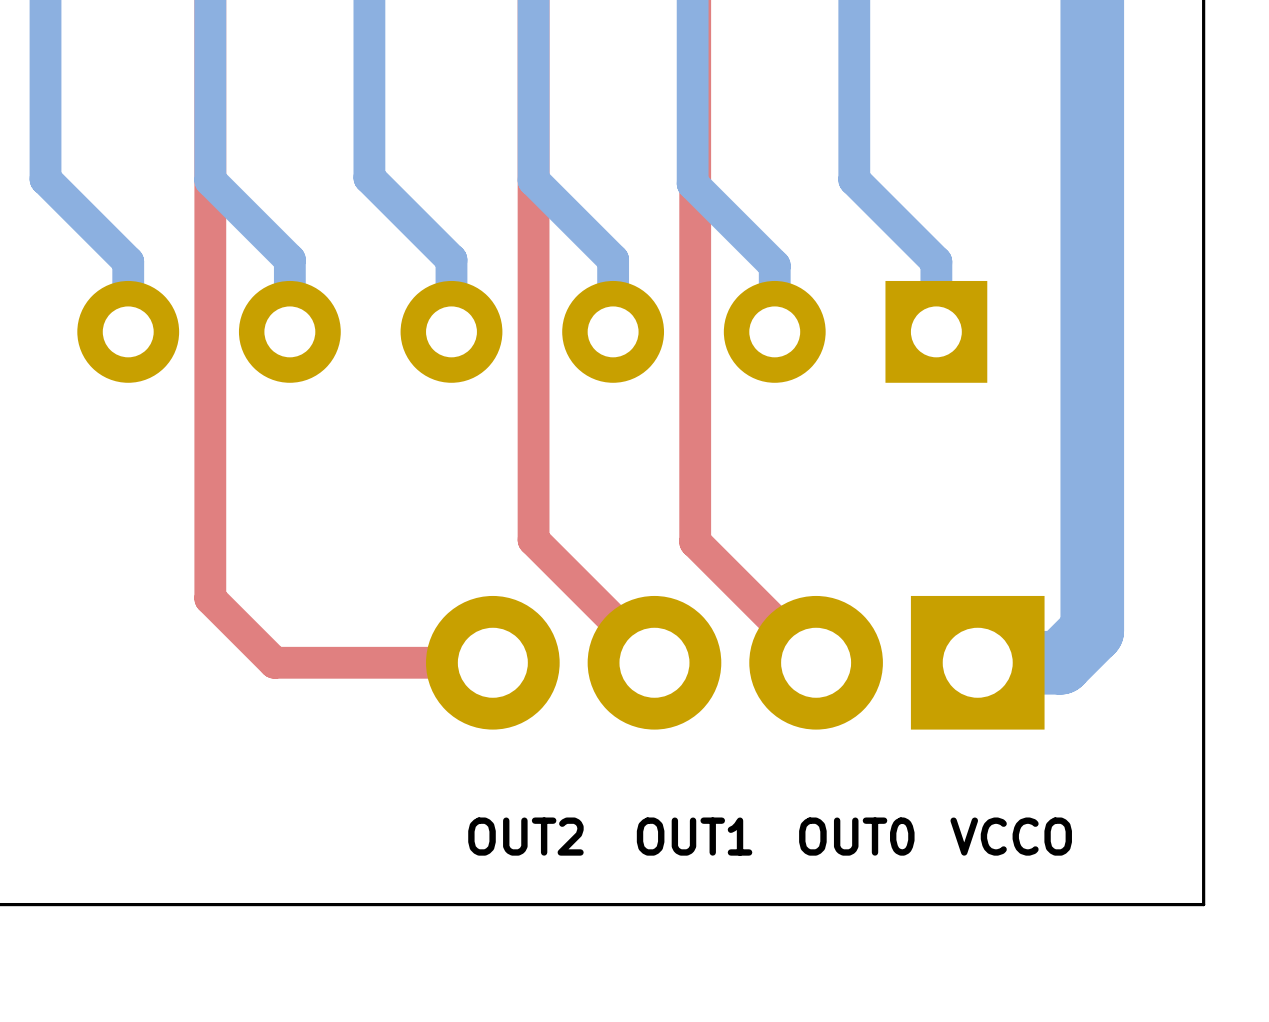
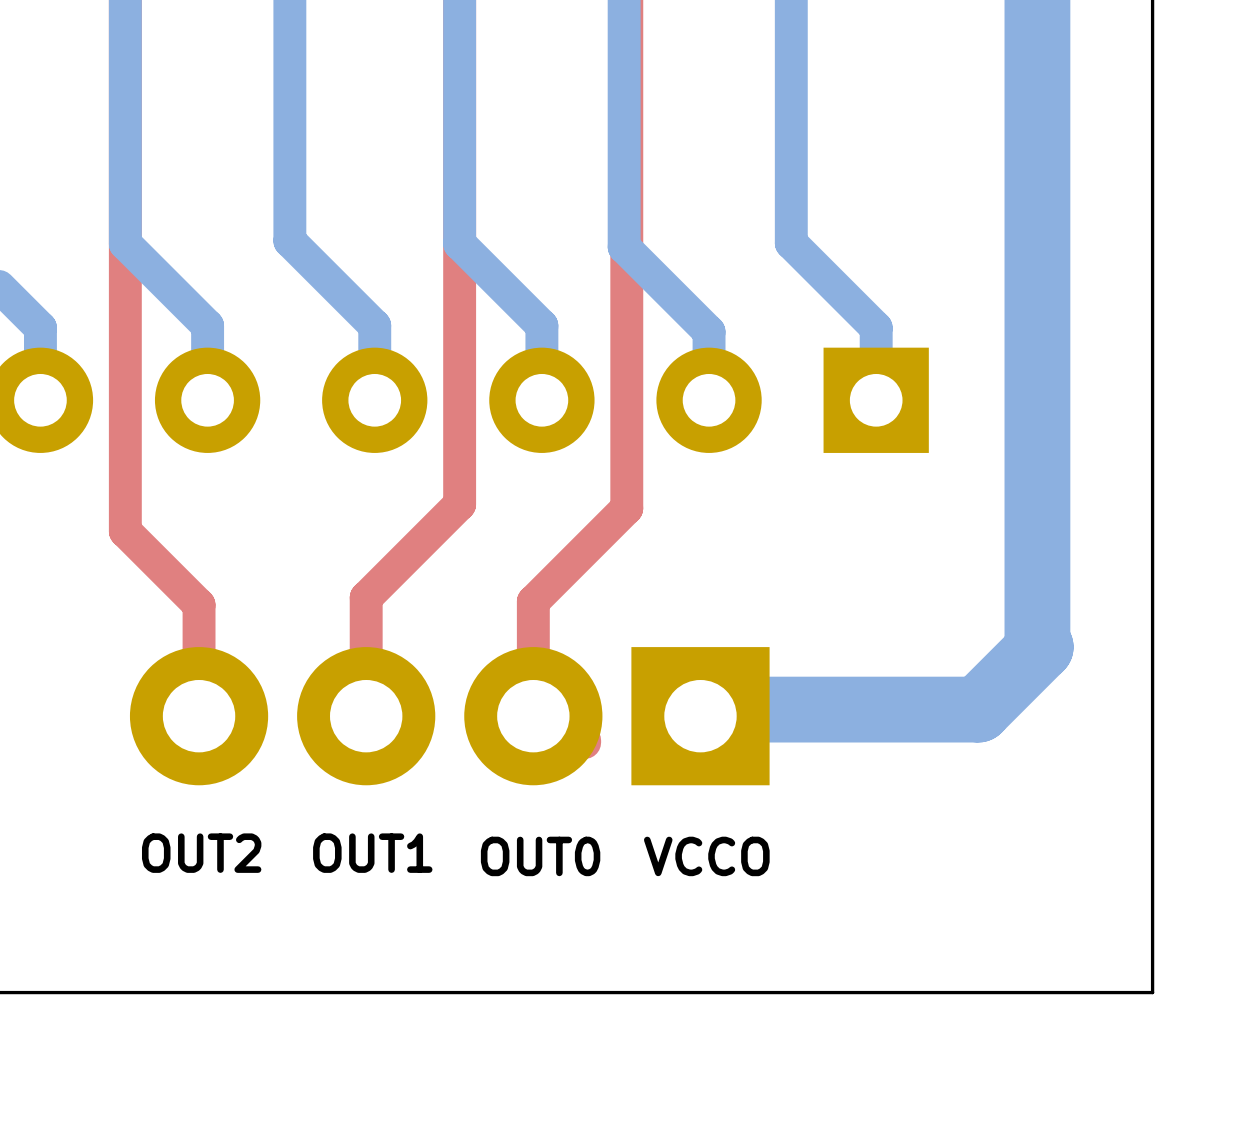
top track: (533, 432) (533, 539) (654, 660) -> (459, 504) (366, 597) (366, 716)
top track: (695, 436) (695, 541) (816, 662) -> (626, 508) (533, 601) (533, 716)
top track: (210, 458) (210, 598) (274, 662) (492, 662) -> (125, 531) (199, 604) (199, 716)
bottom track: (1092, 567) (1092, 630) (1060, 662) (977, 662) -> (1037, 643) (1040, 647) (978, 709) (707, 709) (700, 716)
part position: (735, 662) -> (449, 716)
text position: OUT2 (525, 836) -> OUT2 (201, 853)
text position: OUT1 (694, 836) -> OUT1 (372, 853)
text position: OUT0 (856, 836) -> OUT0 (540, 856)
text position: VCCO (1011, 836) -> VCCO (706, 856)

